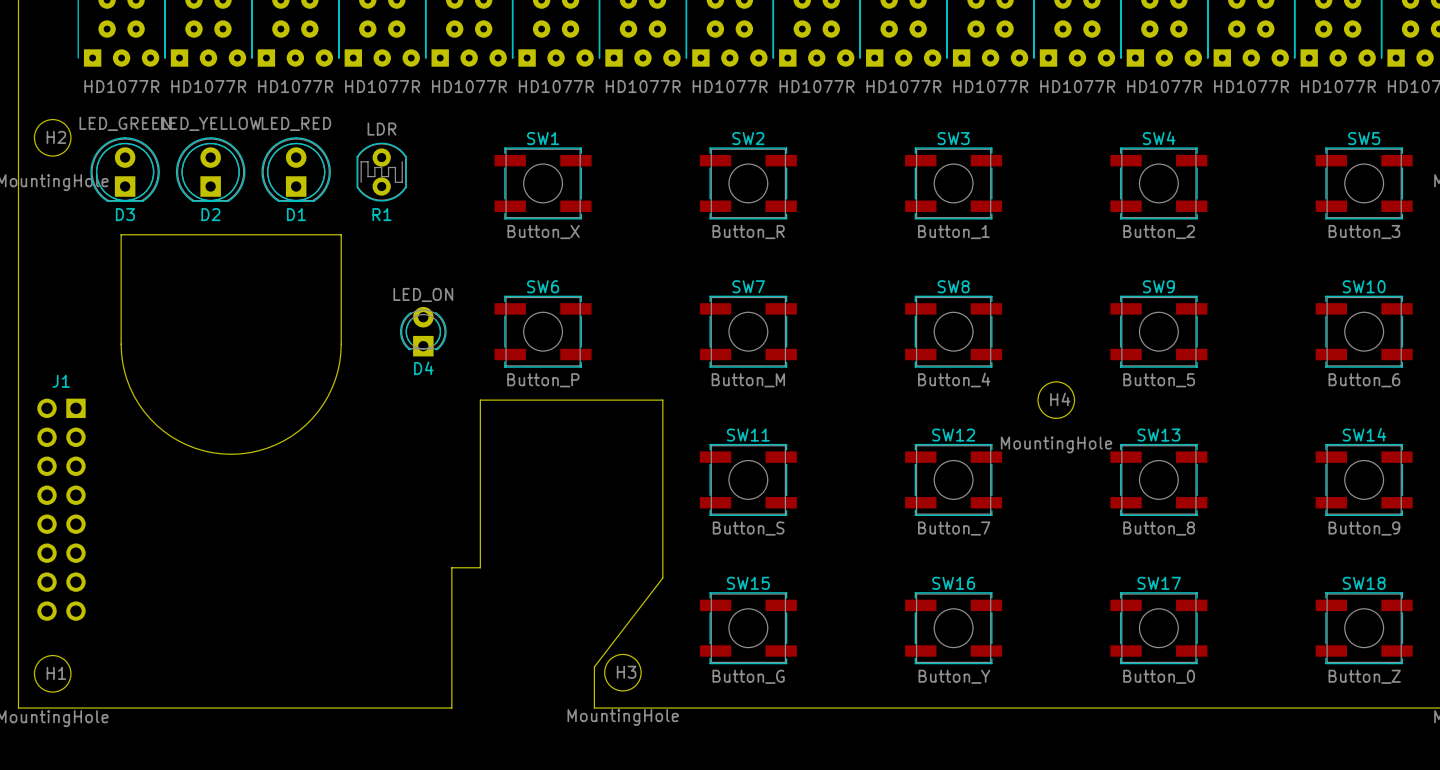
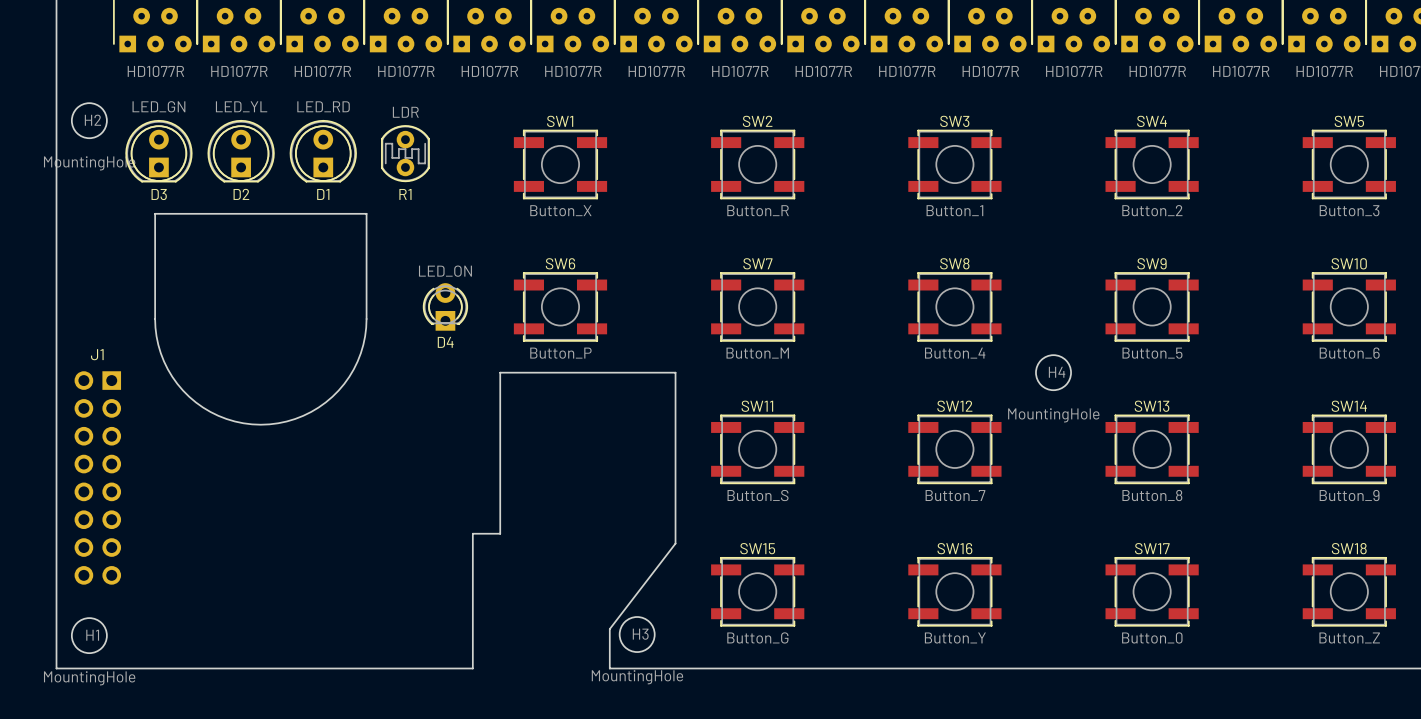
D3 value: LED_GREEN (125, 123) -> LED_GN (158, 106)
D2 value: LED_YELLOW (211, 123) -> LED_YL (241, 106)
D1 value: LED_RED (296, 123) -> LED_RD (323, 106)

